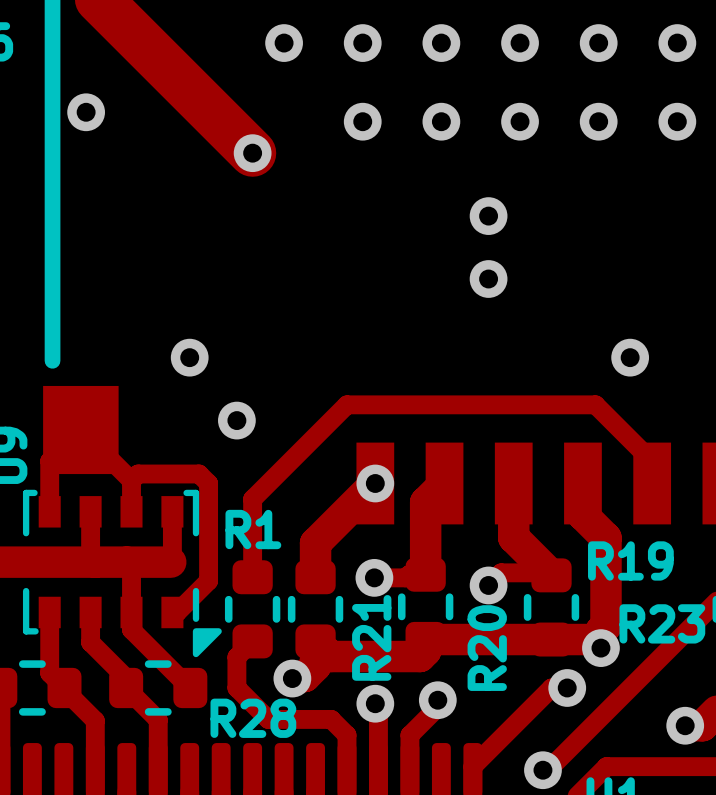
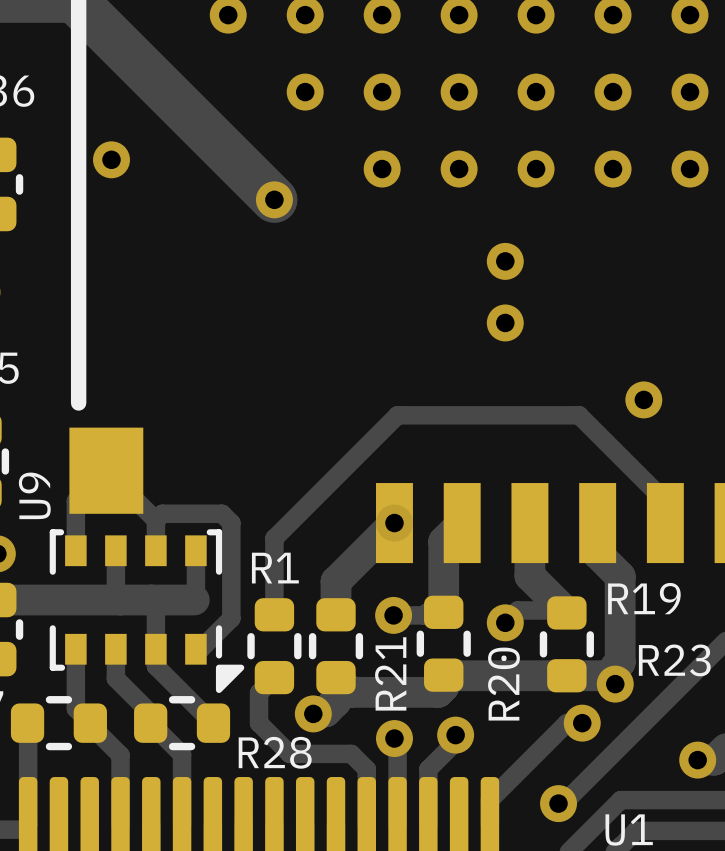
via: (189, 357) -> none
track: (347, 404) (595, 404) -> (366, 446) (397, 415) (579, 415) (609, 446)
via: (236, 420) -> none

